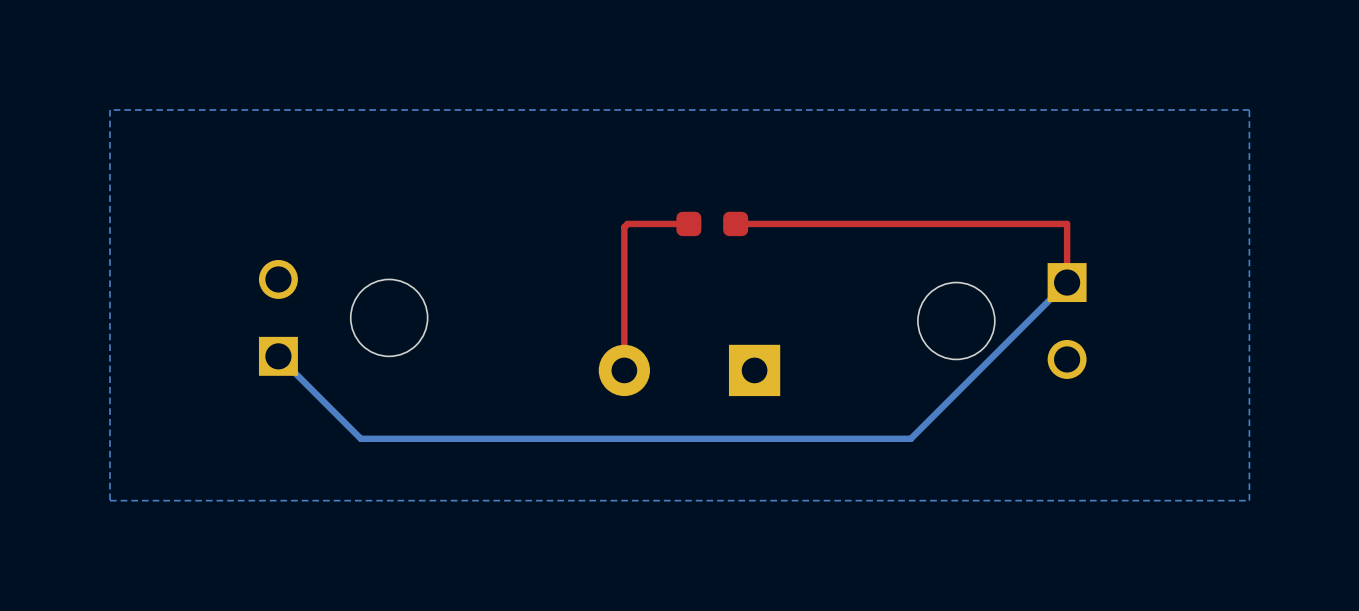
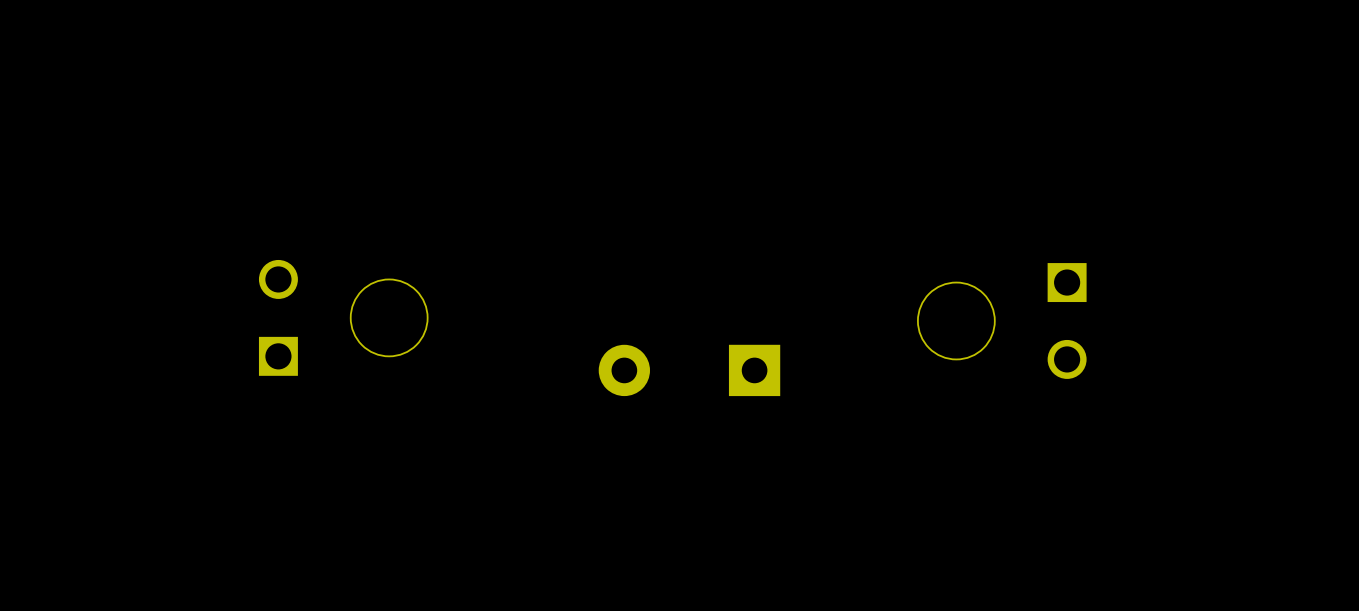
bottom zone outline: (1249, 110) (1249, 500) (110, 500) (110, 110) (1249, 110) -> none
top track: (688, 223) (627, 223) (624, 227) (624, 370) -> none
part: (712, 223) -> none
top track: (735, 223) (1067, 223) (1067, 282) -> none
bottom track: (1067, 282) (910, 438) (360, 438) (278, 356) -> none

